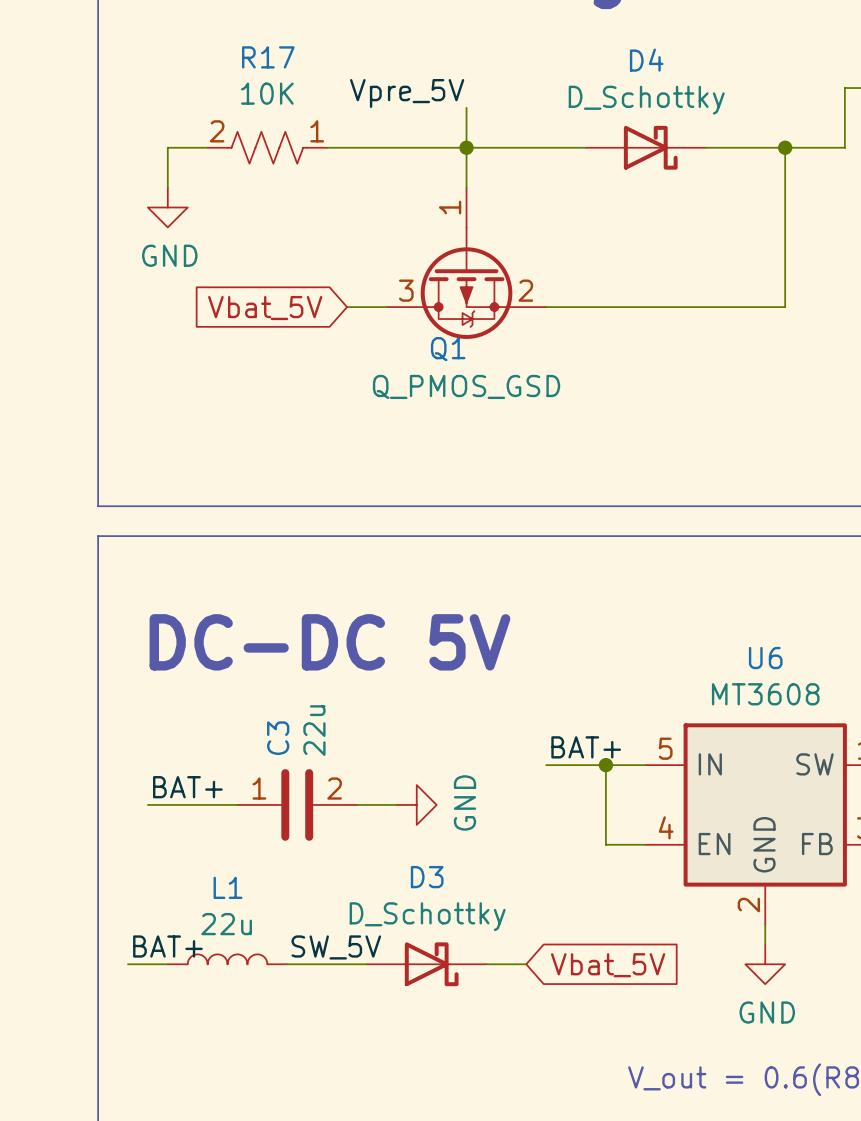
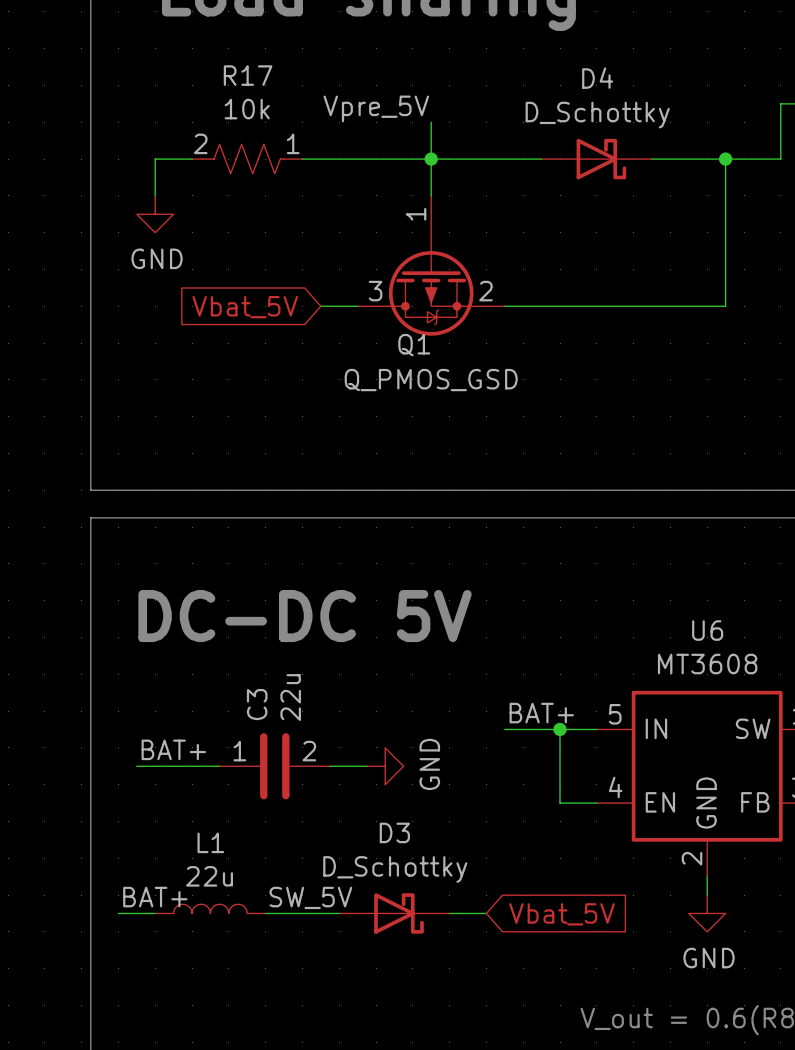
R17 value: 10K (267, 93) -> 10k (247, 109)

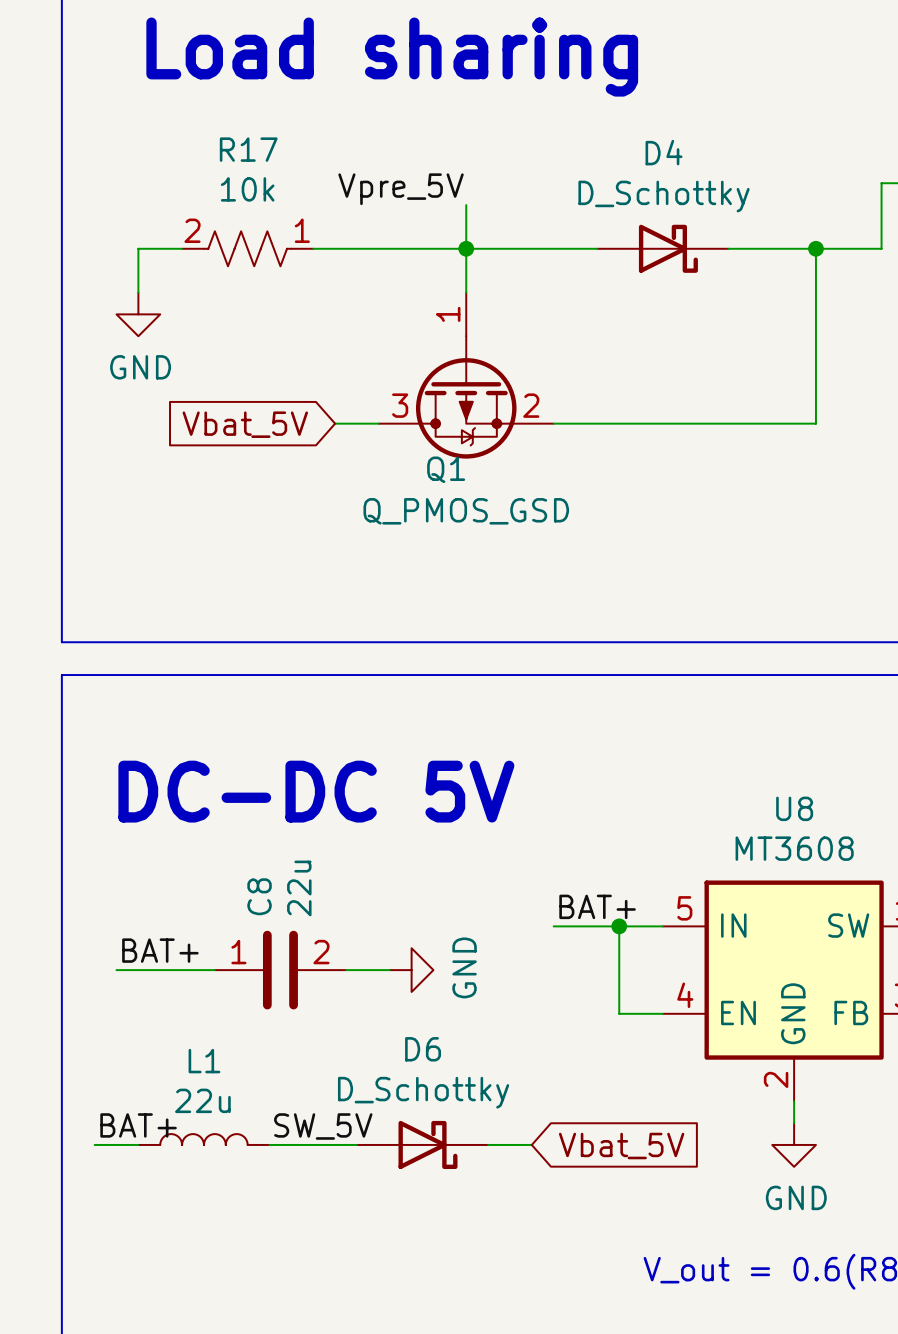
U6 name: U6 (707, 630) -> U8 (794, 808)
C3 name: C3 (257, 704) -> C8 (259, 896)
D3 name: D3 (394, 832) -> D6 (423, 1049)

